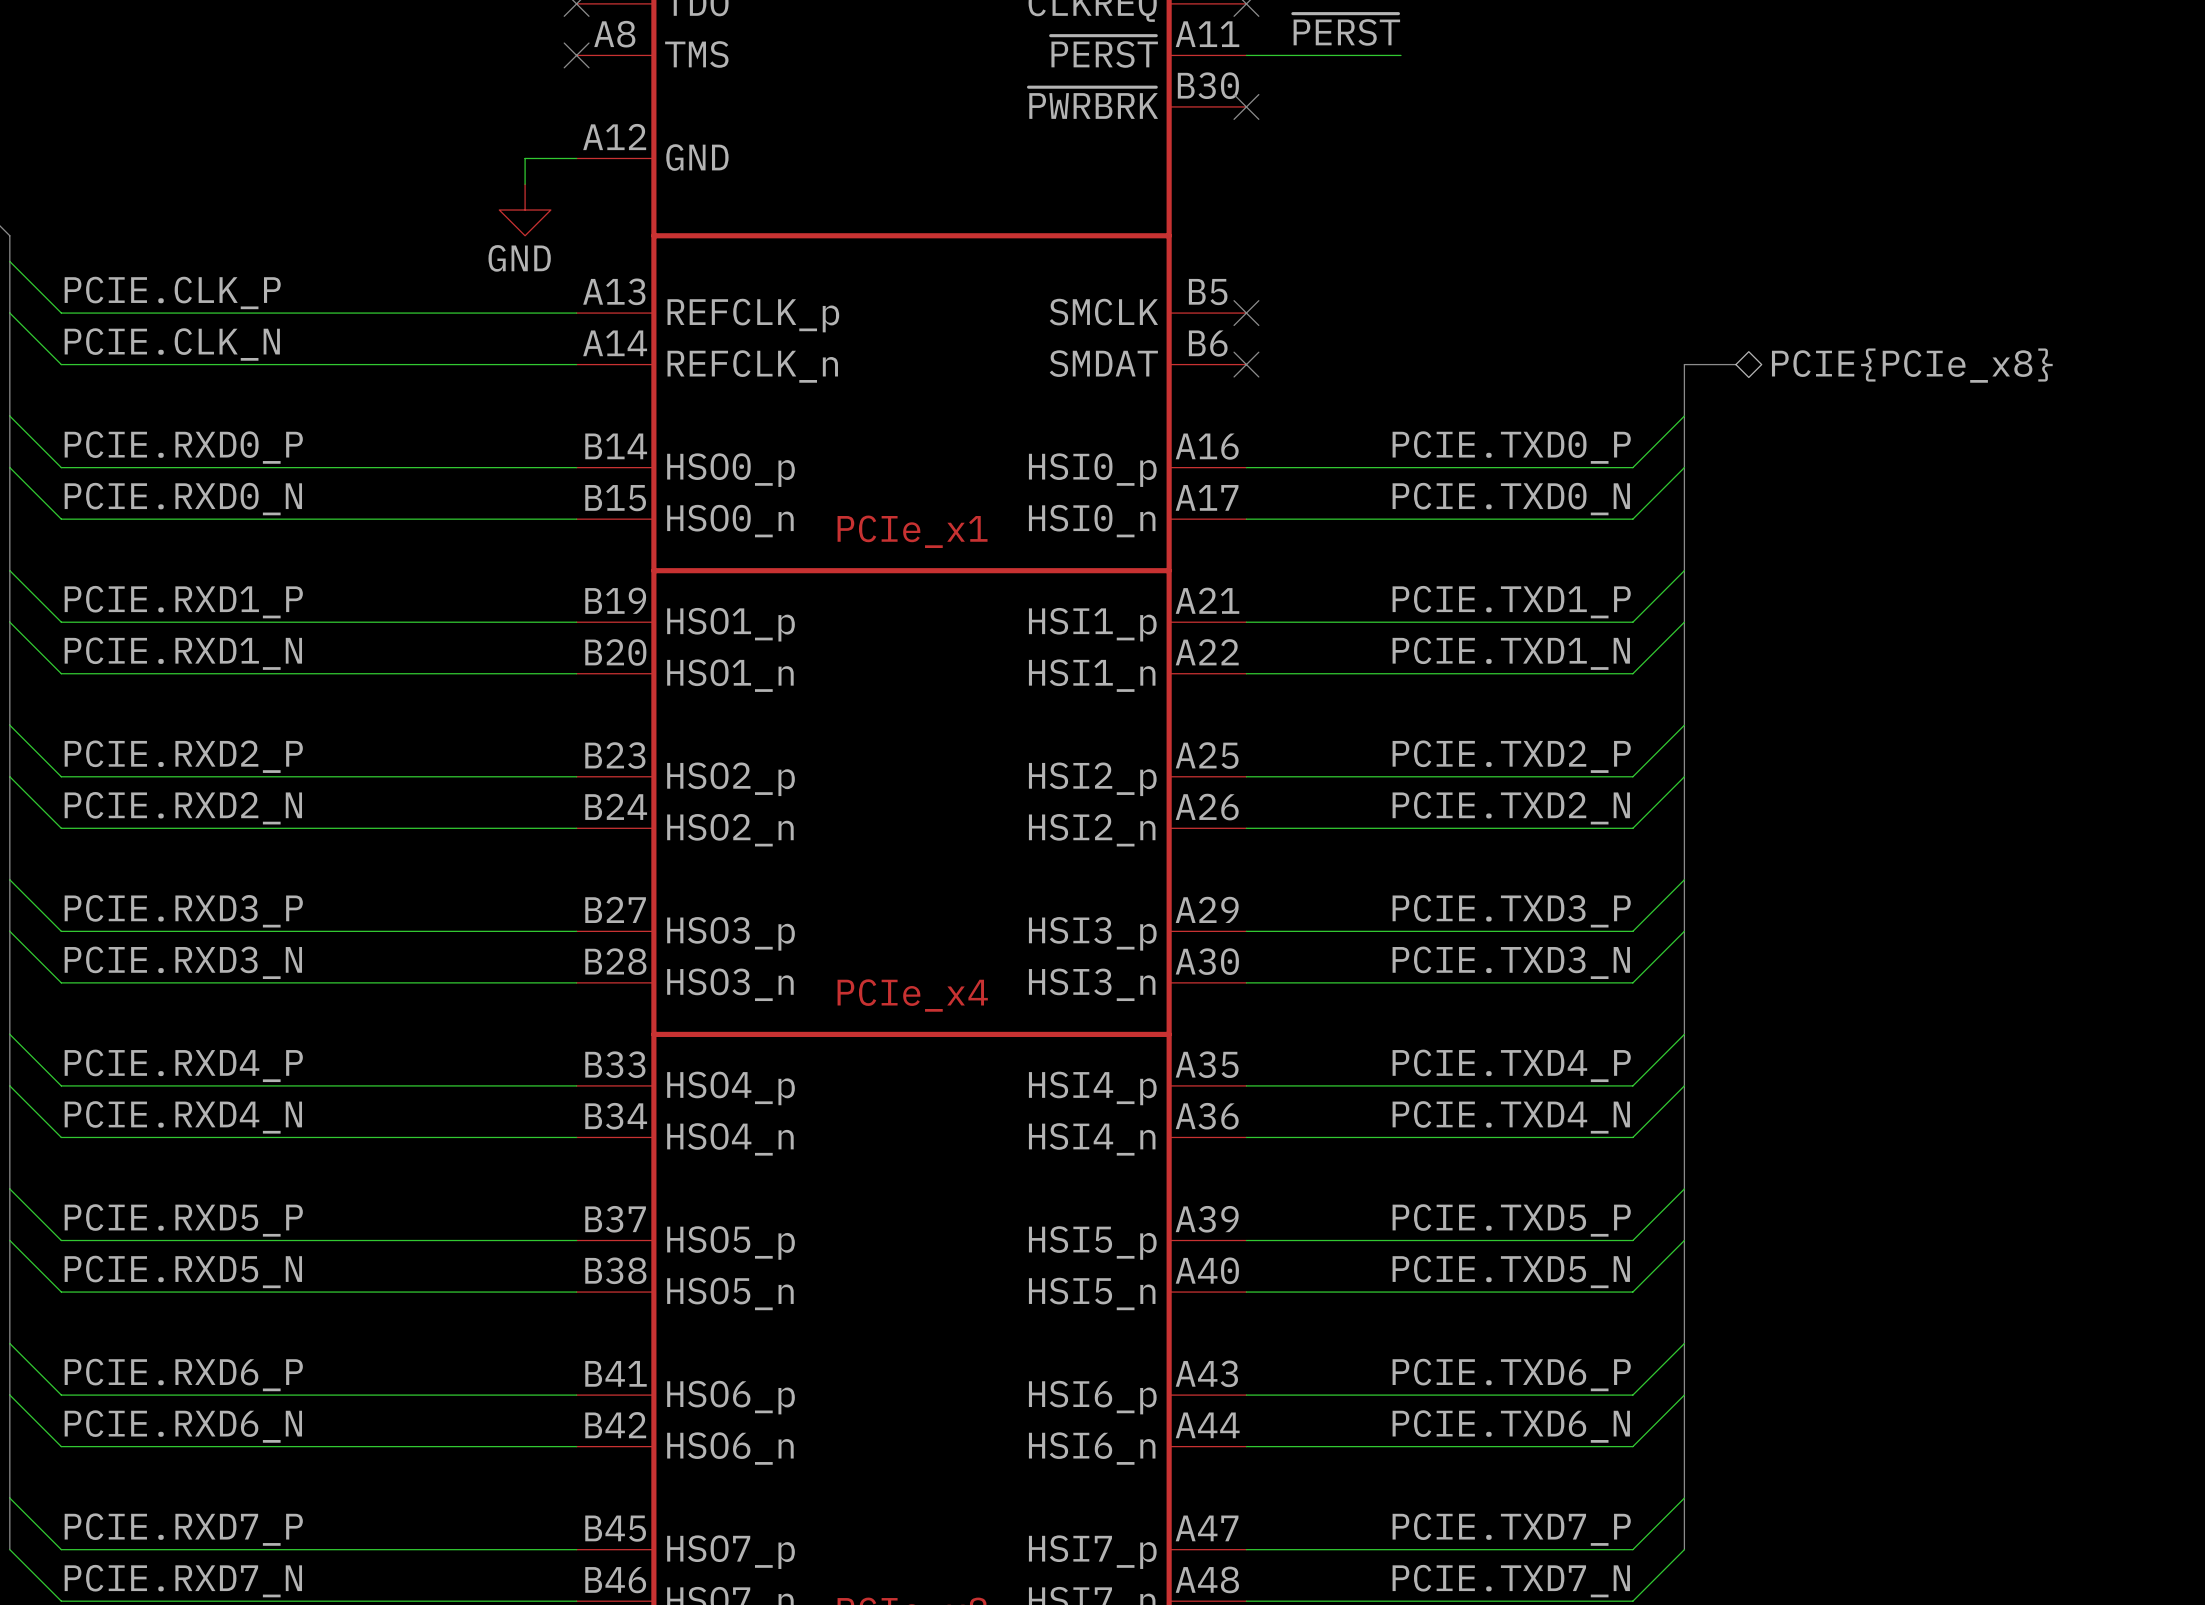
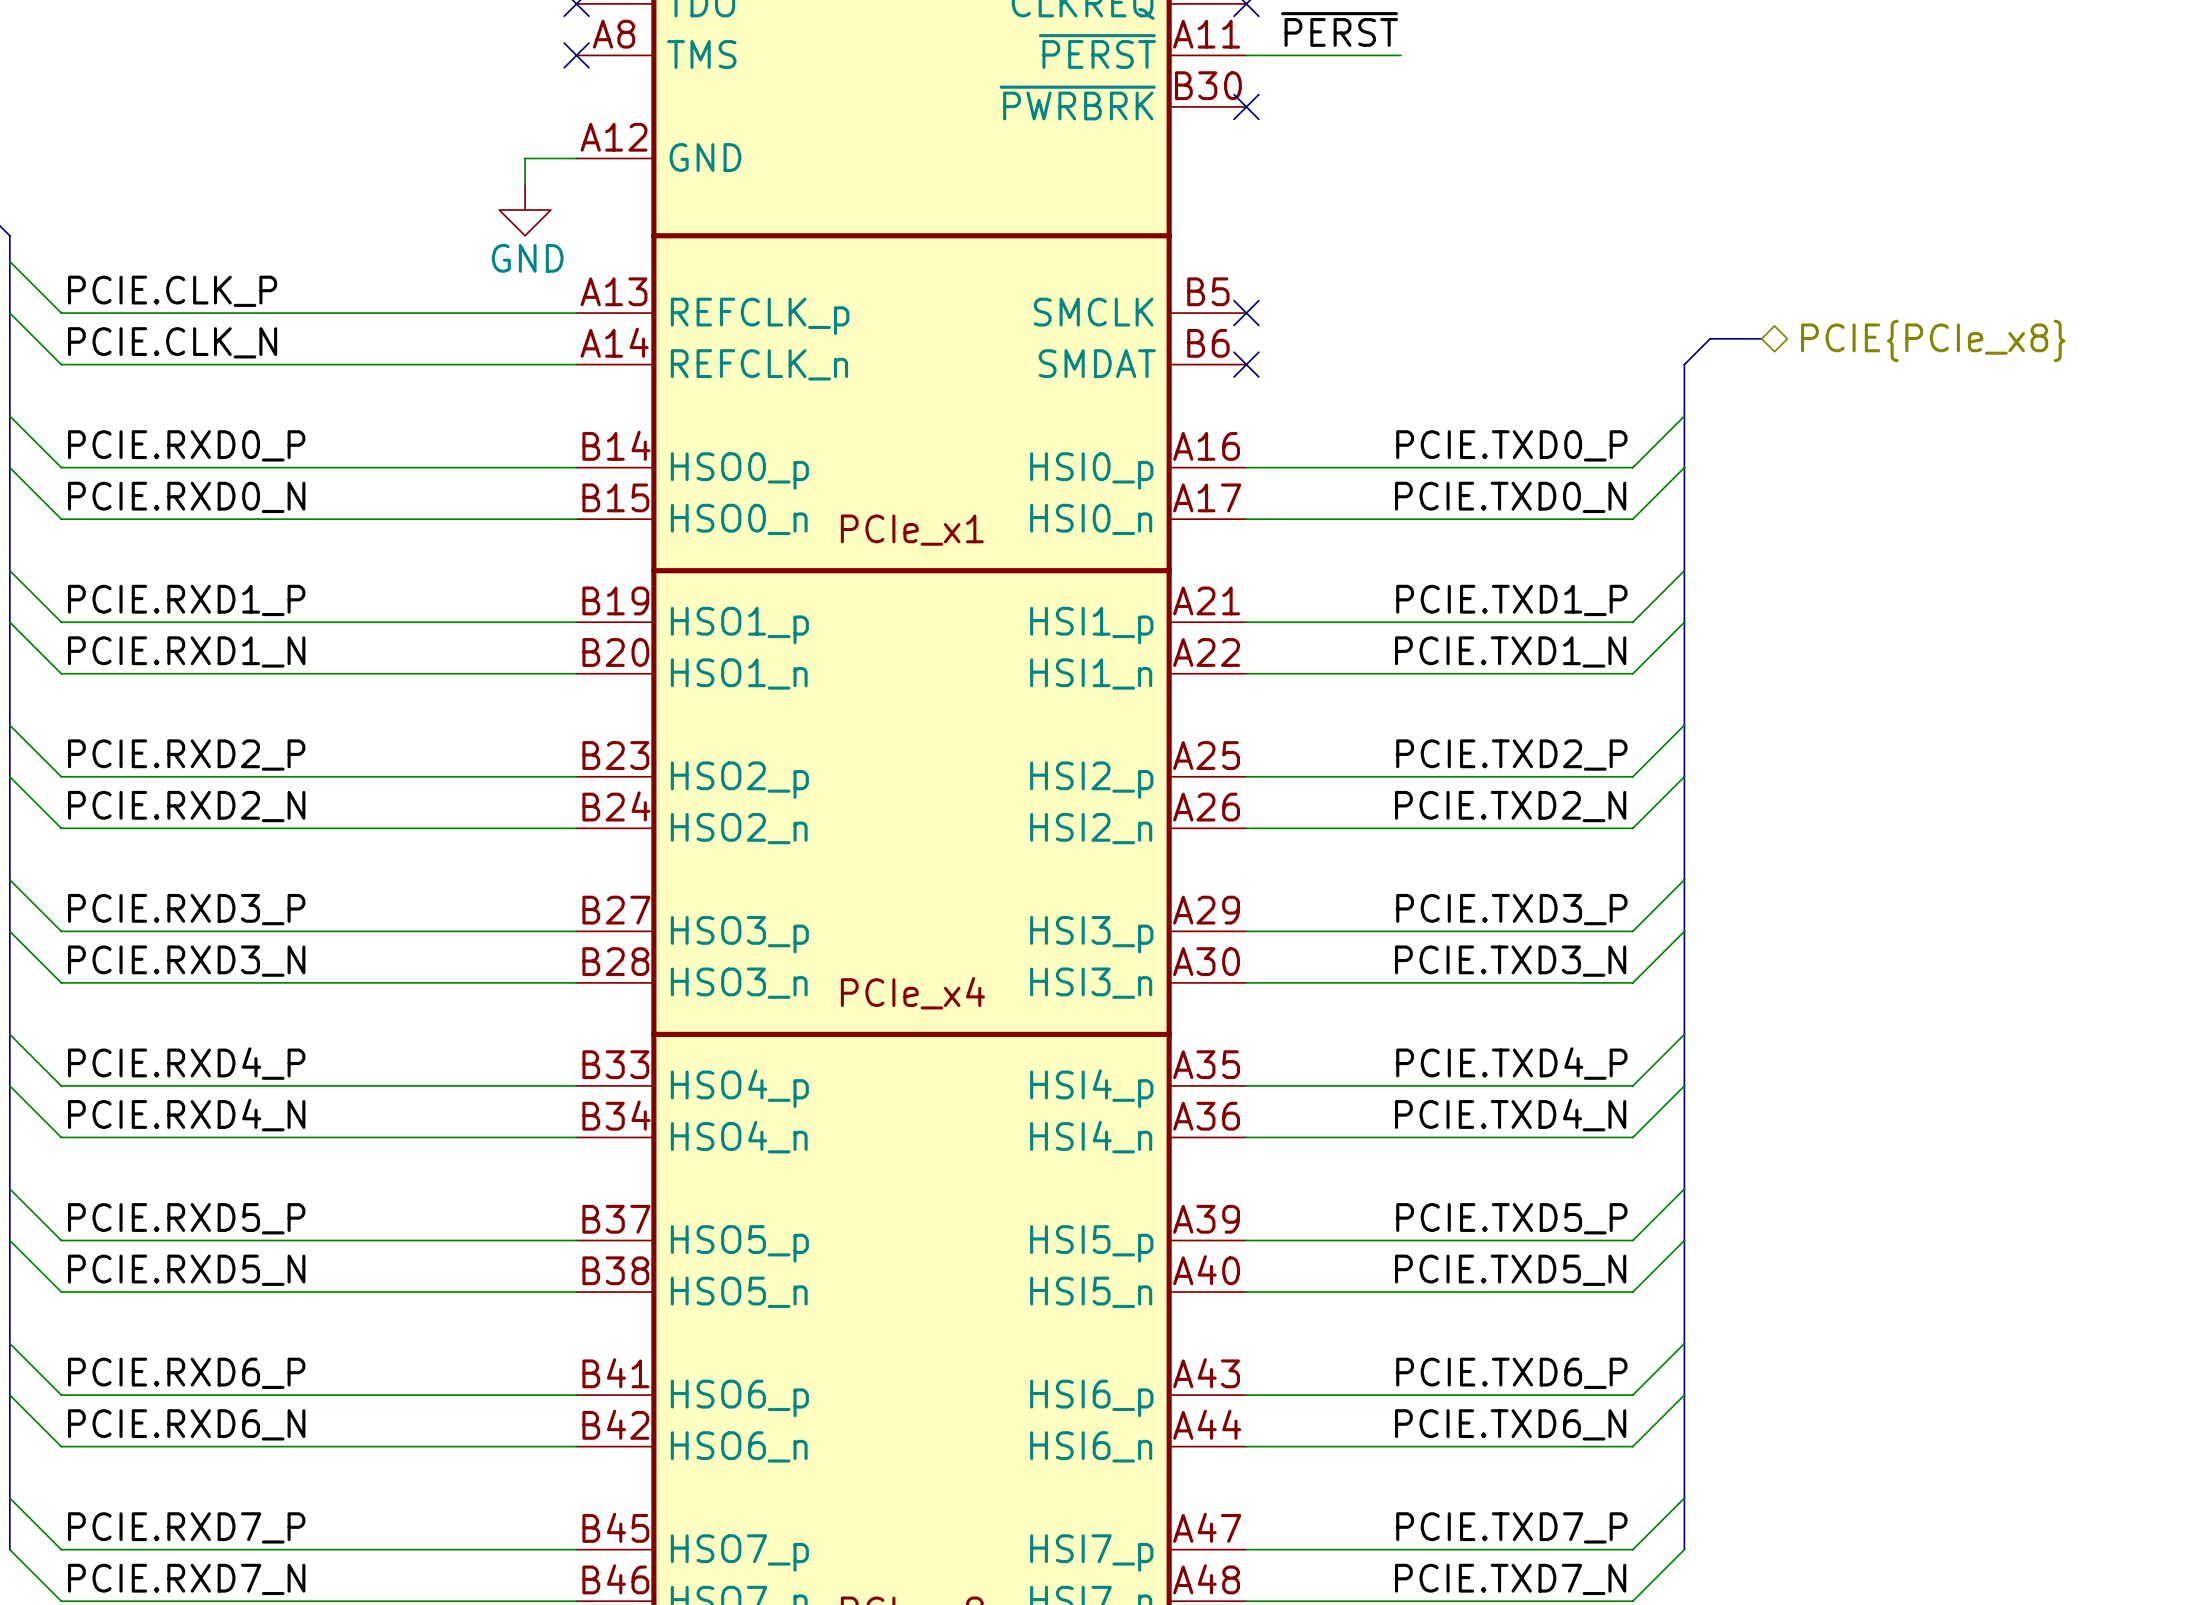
bus: (1684, 364) (1735, 364) -> (1684, 364) (1710, 338) (1761, 338)
hierarchical label position: PCIE{PCIe_x8} (1912, 365) -> PCIE{PCIe_x8} (1933, 340)

